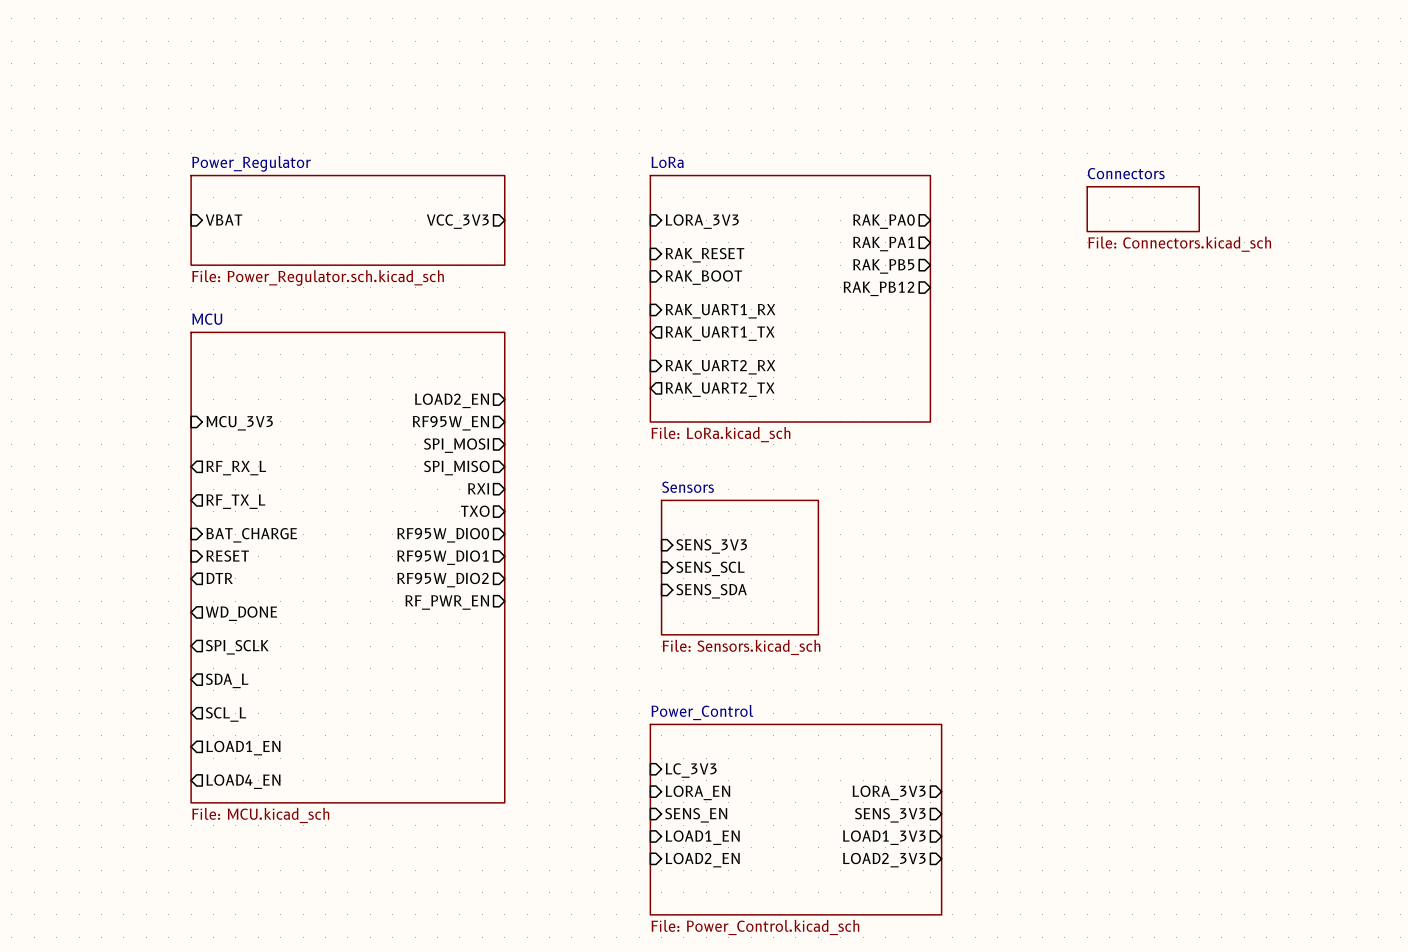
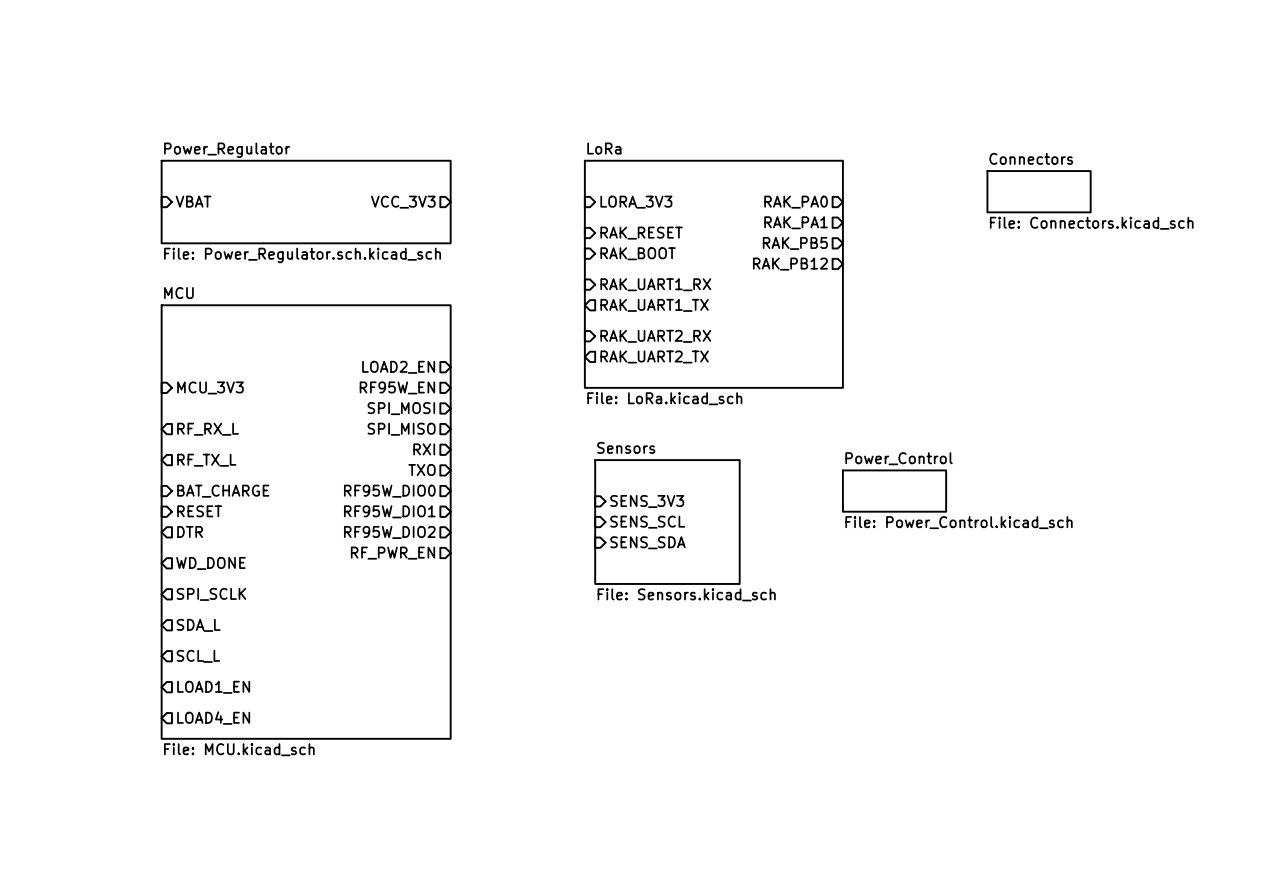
sheet Power_Control: none -> File: Power_Control.kicad_sch (894, 491)
sheet pin: LC_3V3 (691, 770) -> none
sheet pin: LORA_EN (697, 792) -> none
sheet pin: LORA_3V3 (889, 792) -> none
sheet pin: SENS_EN (696, 815) -> none
sheet pin: SENS_3V3 (890, 815) -> none
sheet Power_Control: File: Power_Control.kicad_sch (795, 819) -> none
sheet pin: LOAD1_EN (702, 837) -> none
sheet pin: LOAD1_3V3 (884, 837) -> none
sheet pin: LOAD2_EN (702, 860) -> none
sheet pin: LOAD2_3V3 (884, 860) -> none

